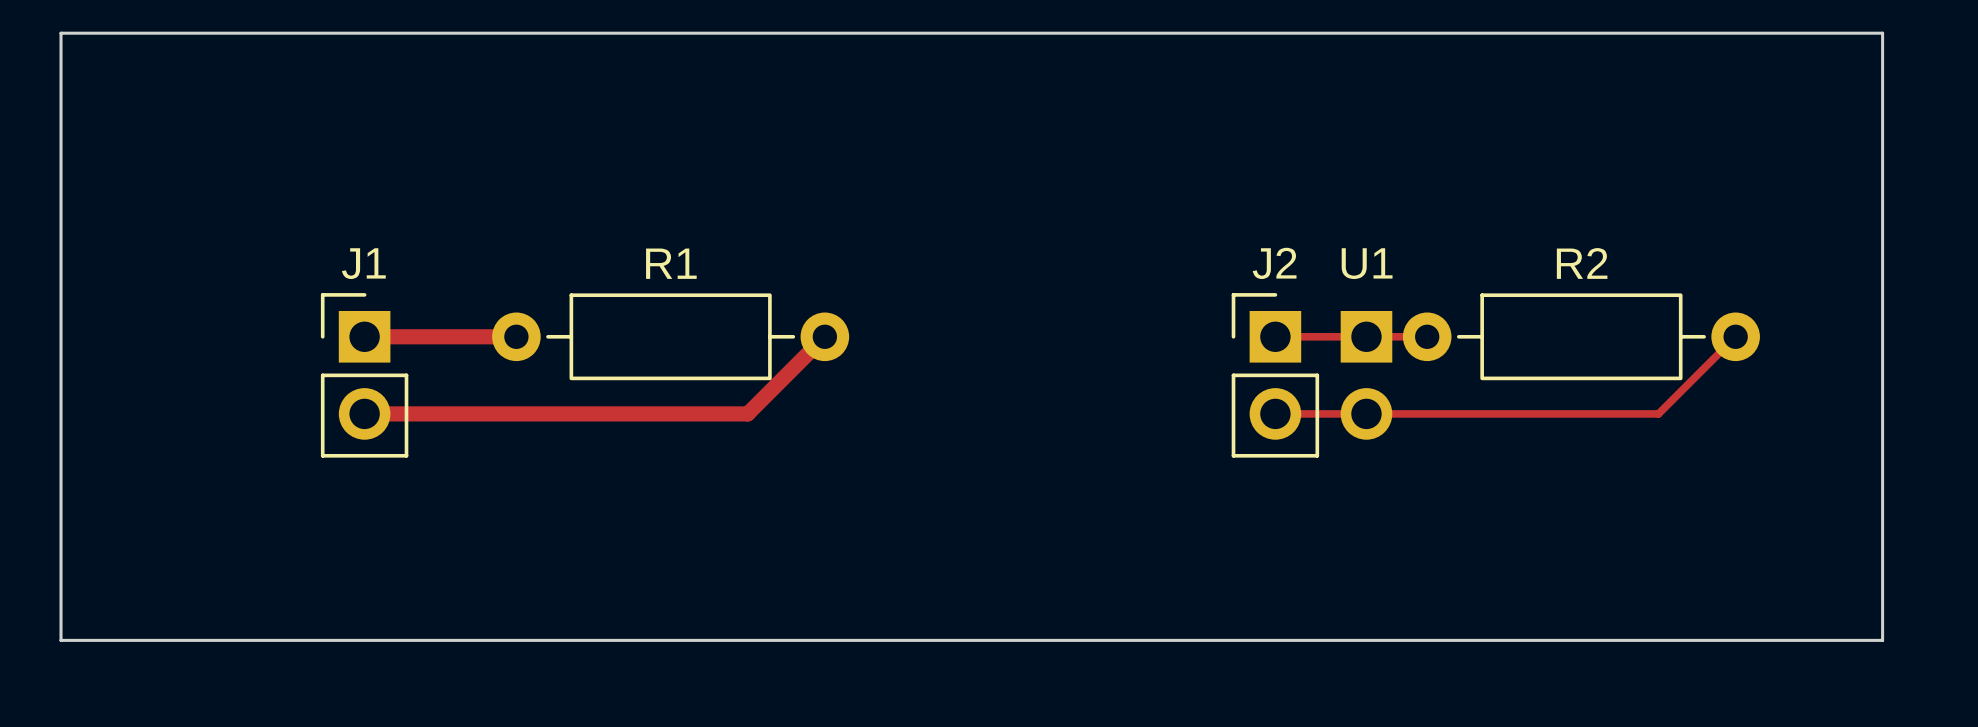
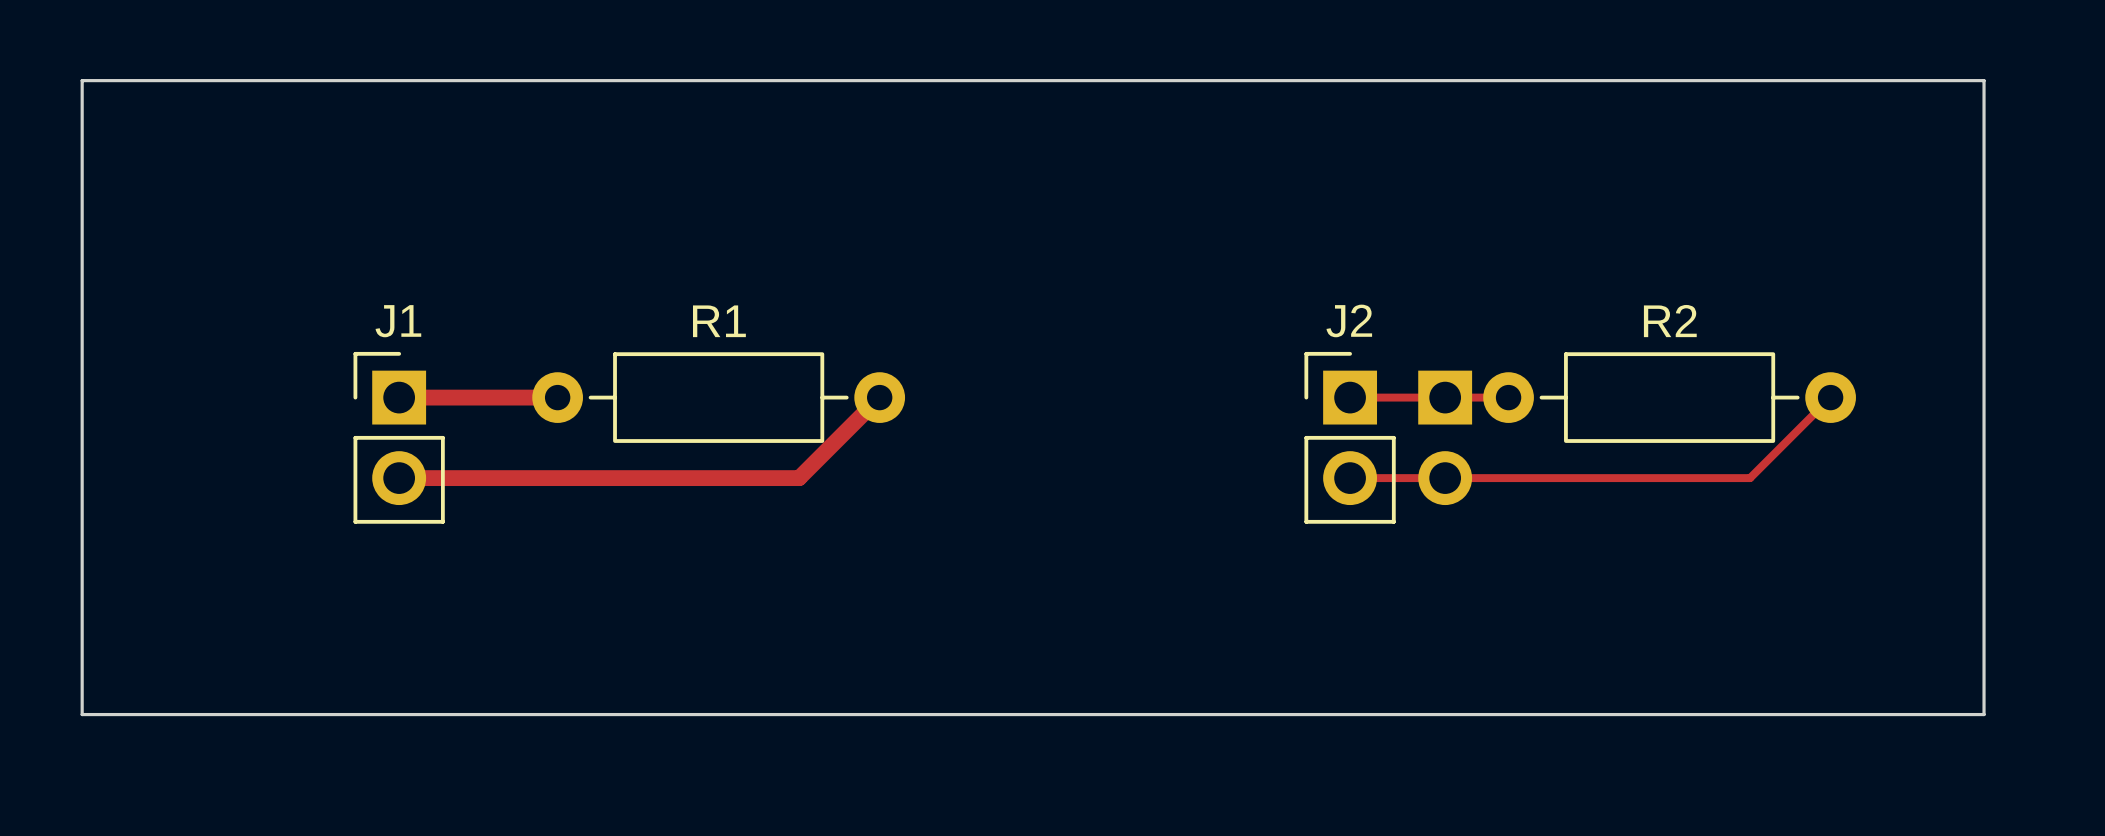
U1 name: U1 (1367, 263) -> none

